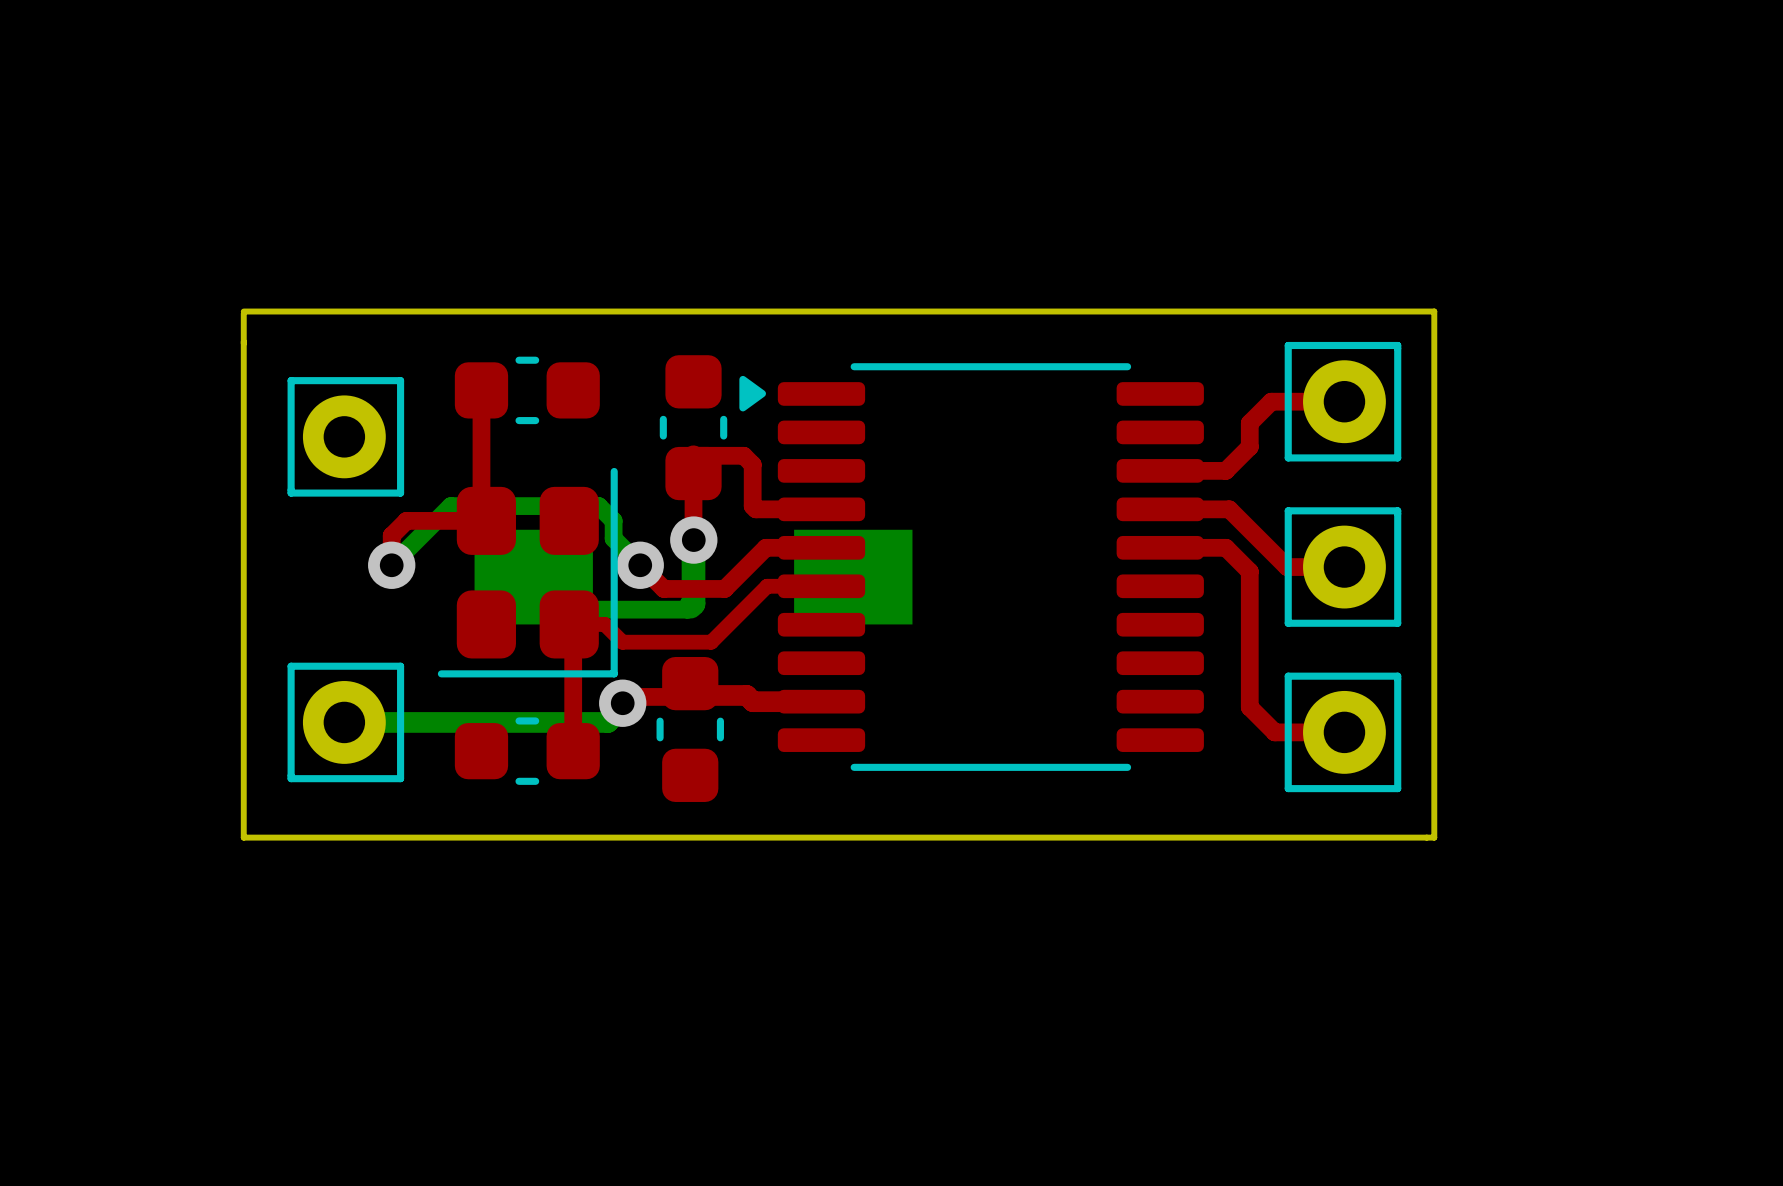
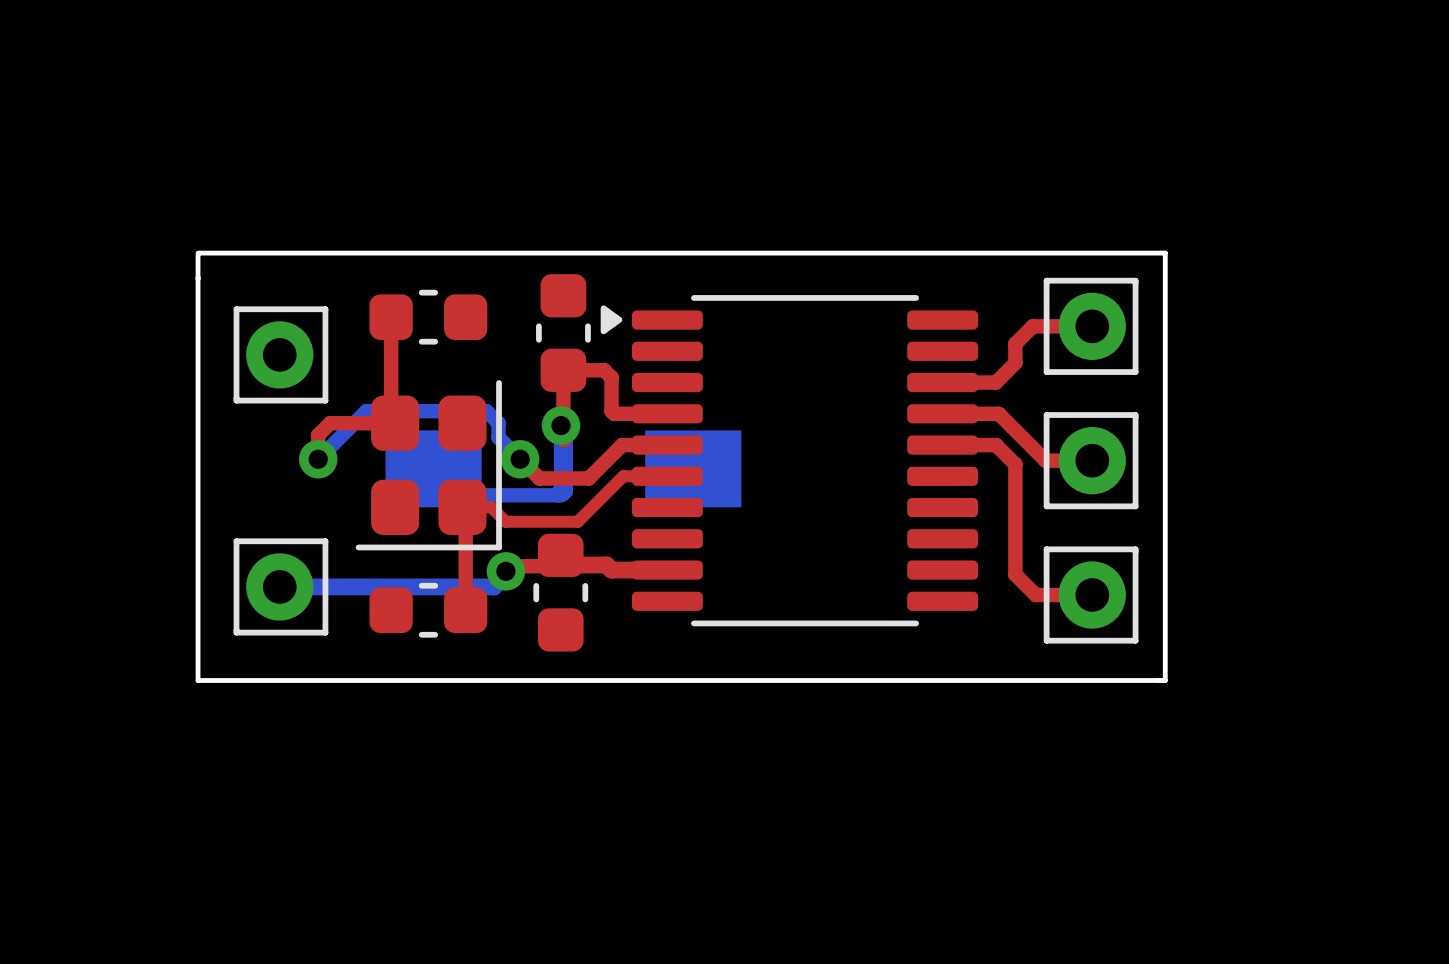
part position: (693, 427) -> (563, 333)
via position: (693, 540) -> (561, 425)

